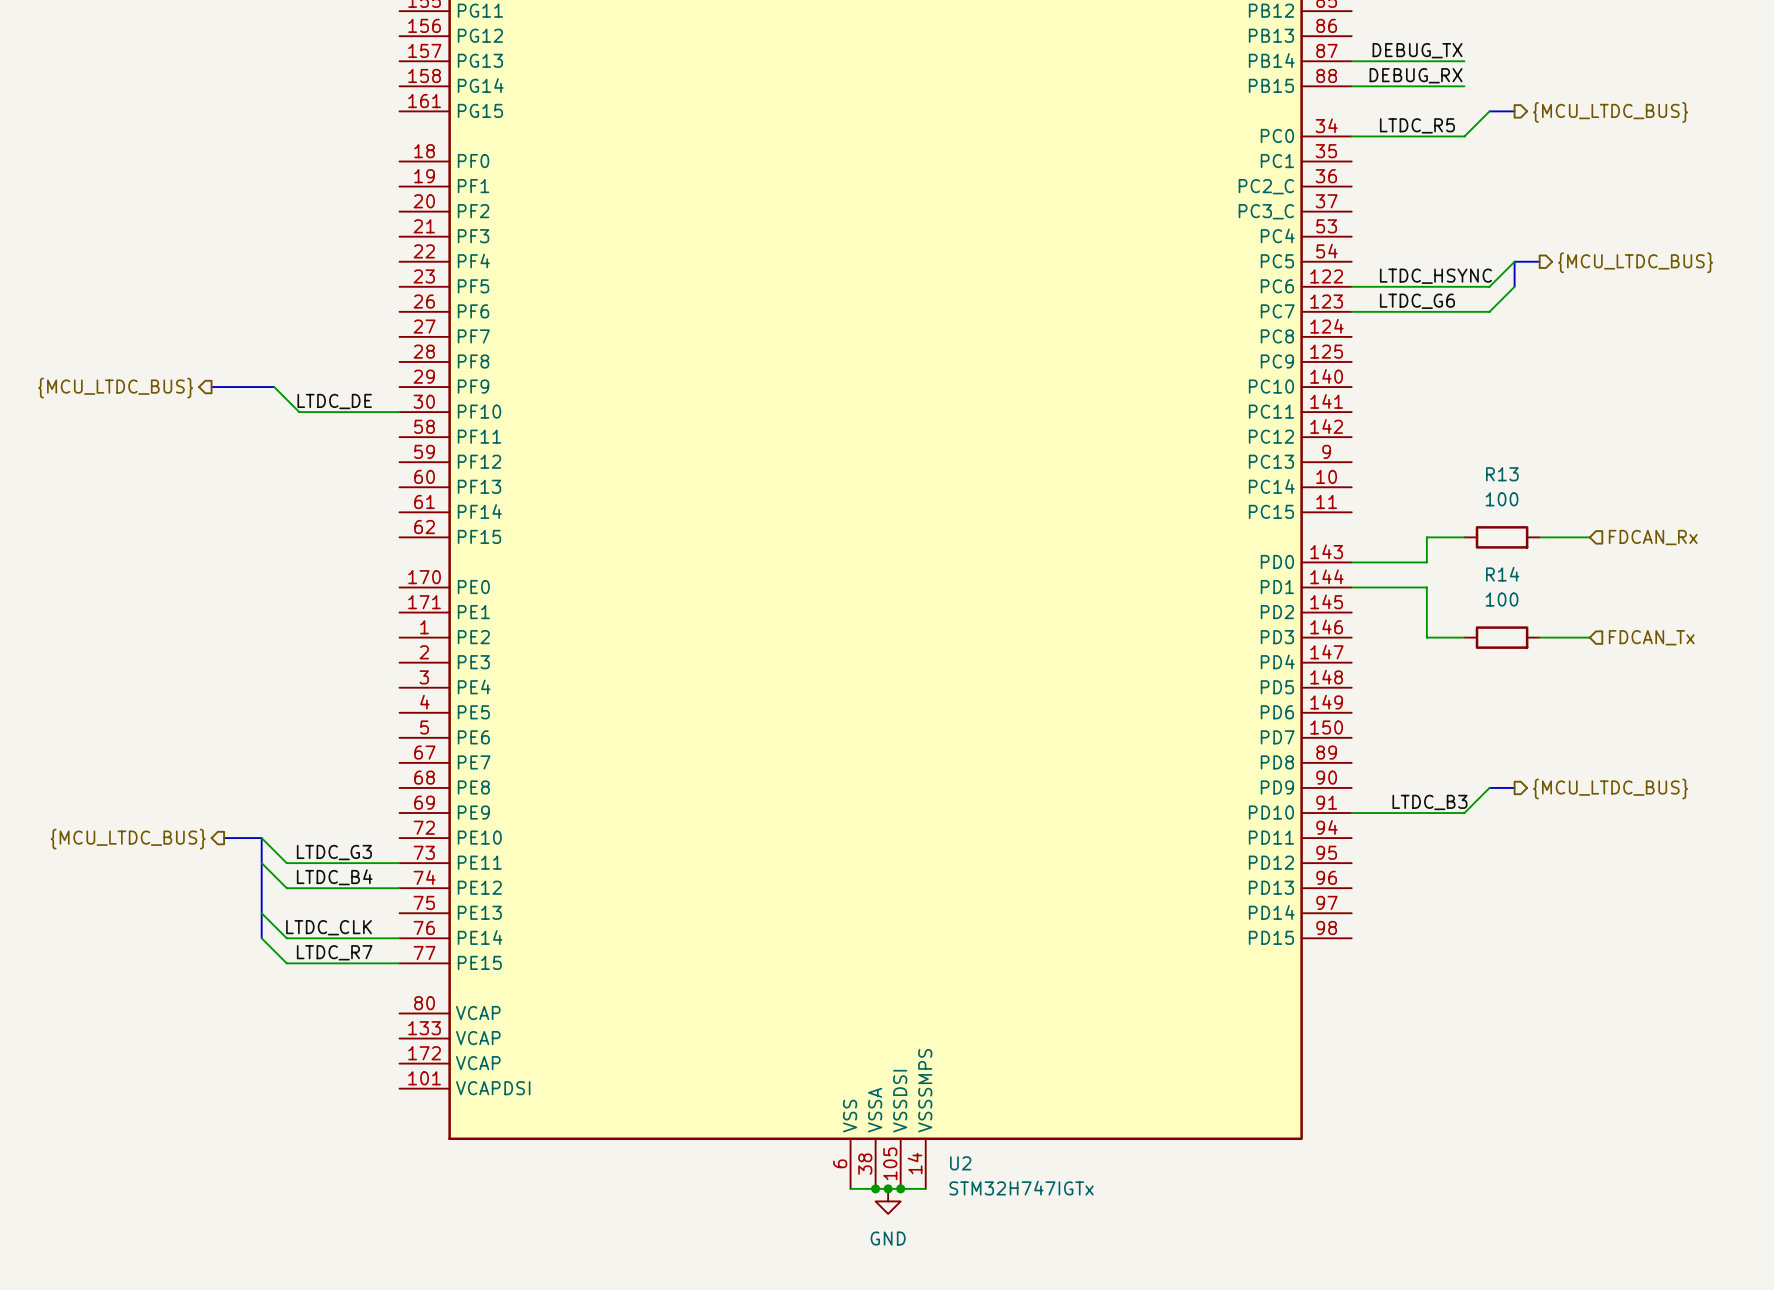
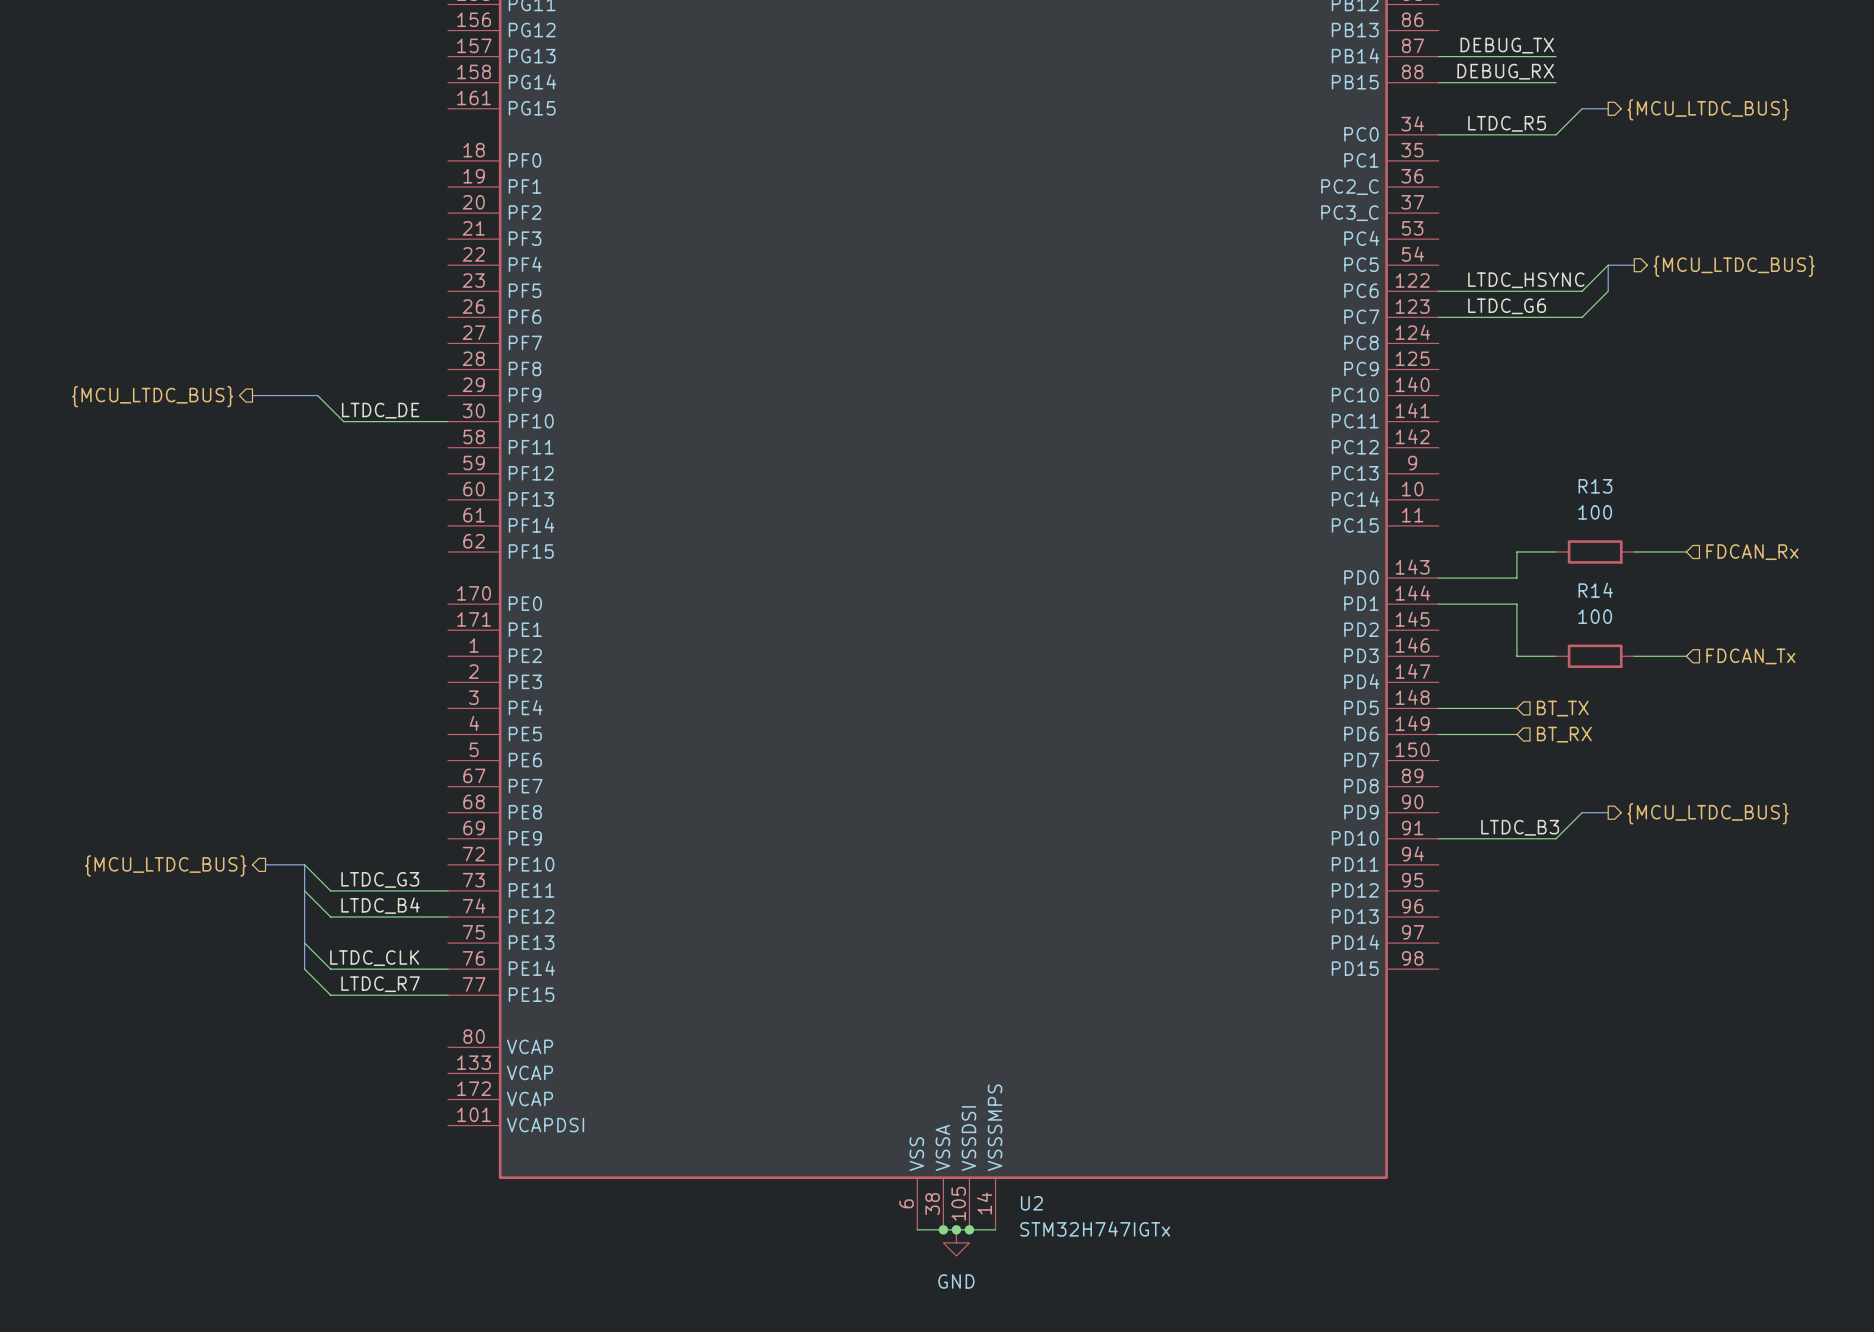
wire: none -> (1438, 708) (1516, 708)
hierarchical label: none -> BT_TX (1562, 708)
wire: none -> (1438, 734) (1516, 734)
hierarchical label: none -> BT_RX (1564, 734)

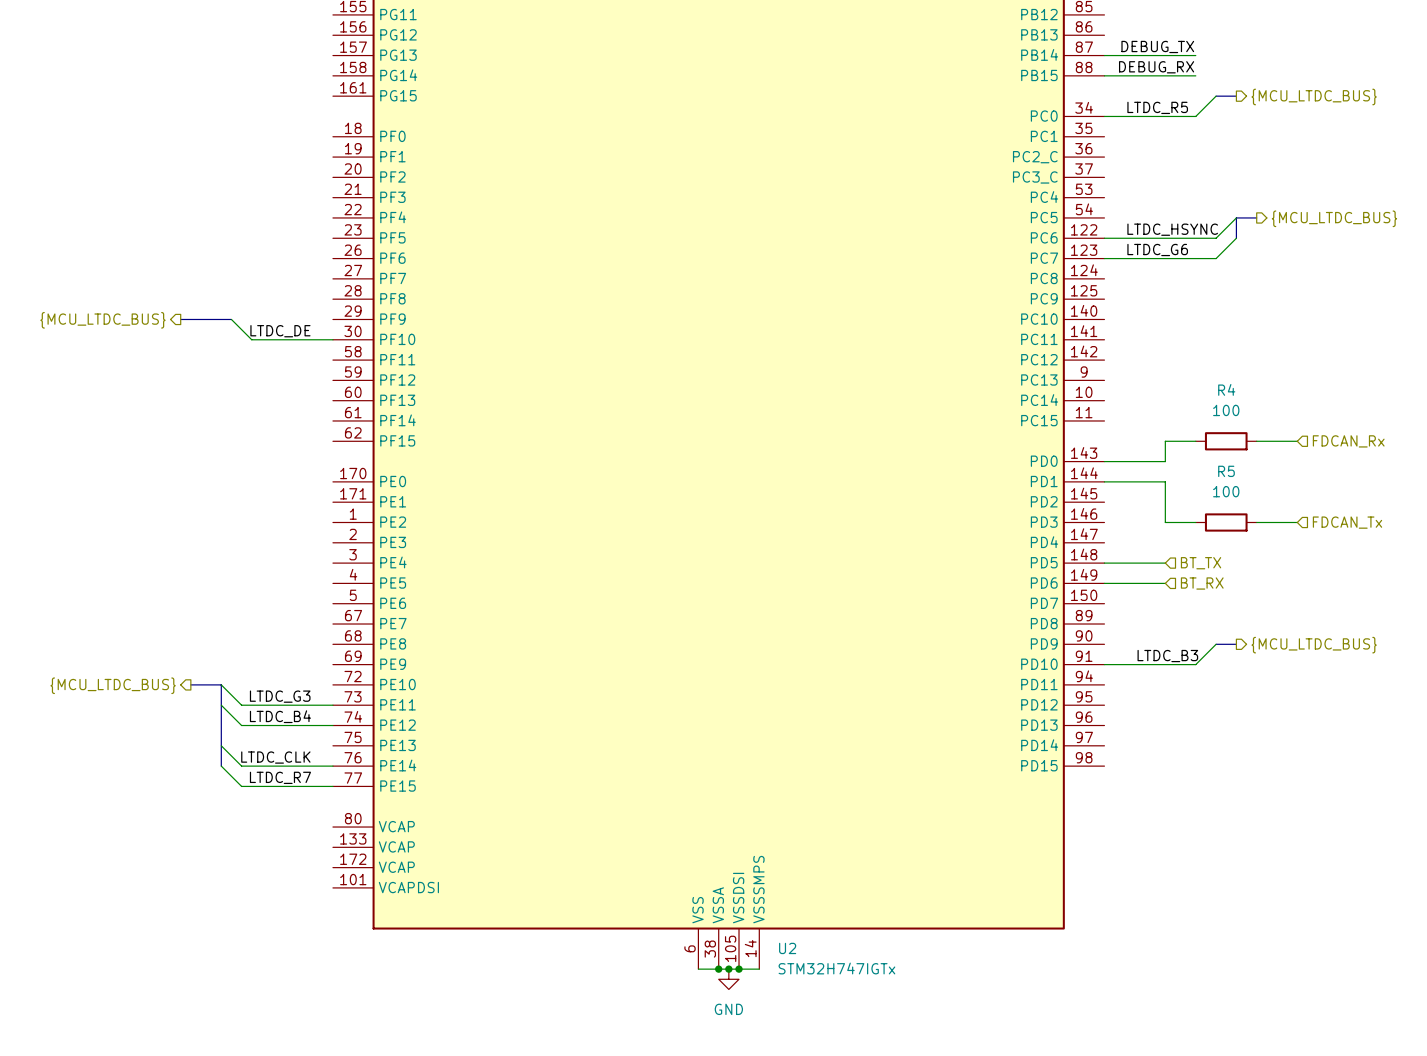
R13 name: R13 (1595, 486) -> R4 (1226, 389)
R14 name: R14 (1595, 590) -> R5 (1226, 471)

